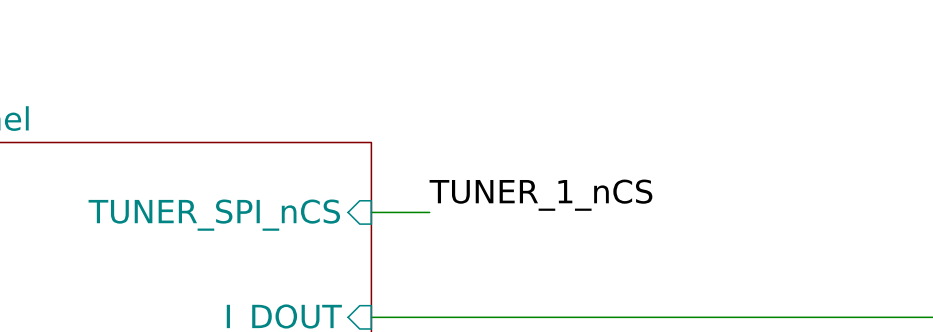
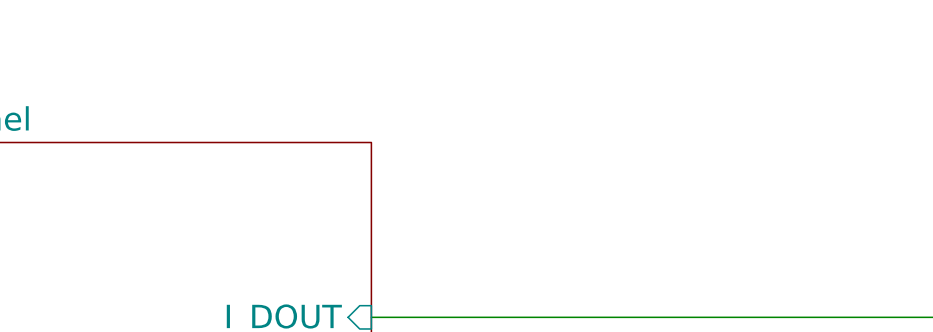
label: TUNER_1_nCS (540, 195) -> none
wire: (371, 212) (429, 212) -> none
sheet pin: TUNER_SPI_nCS (214, 215) -> none

